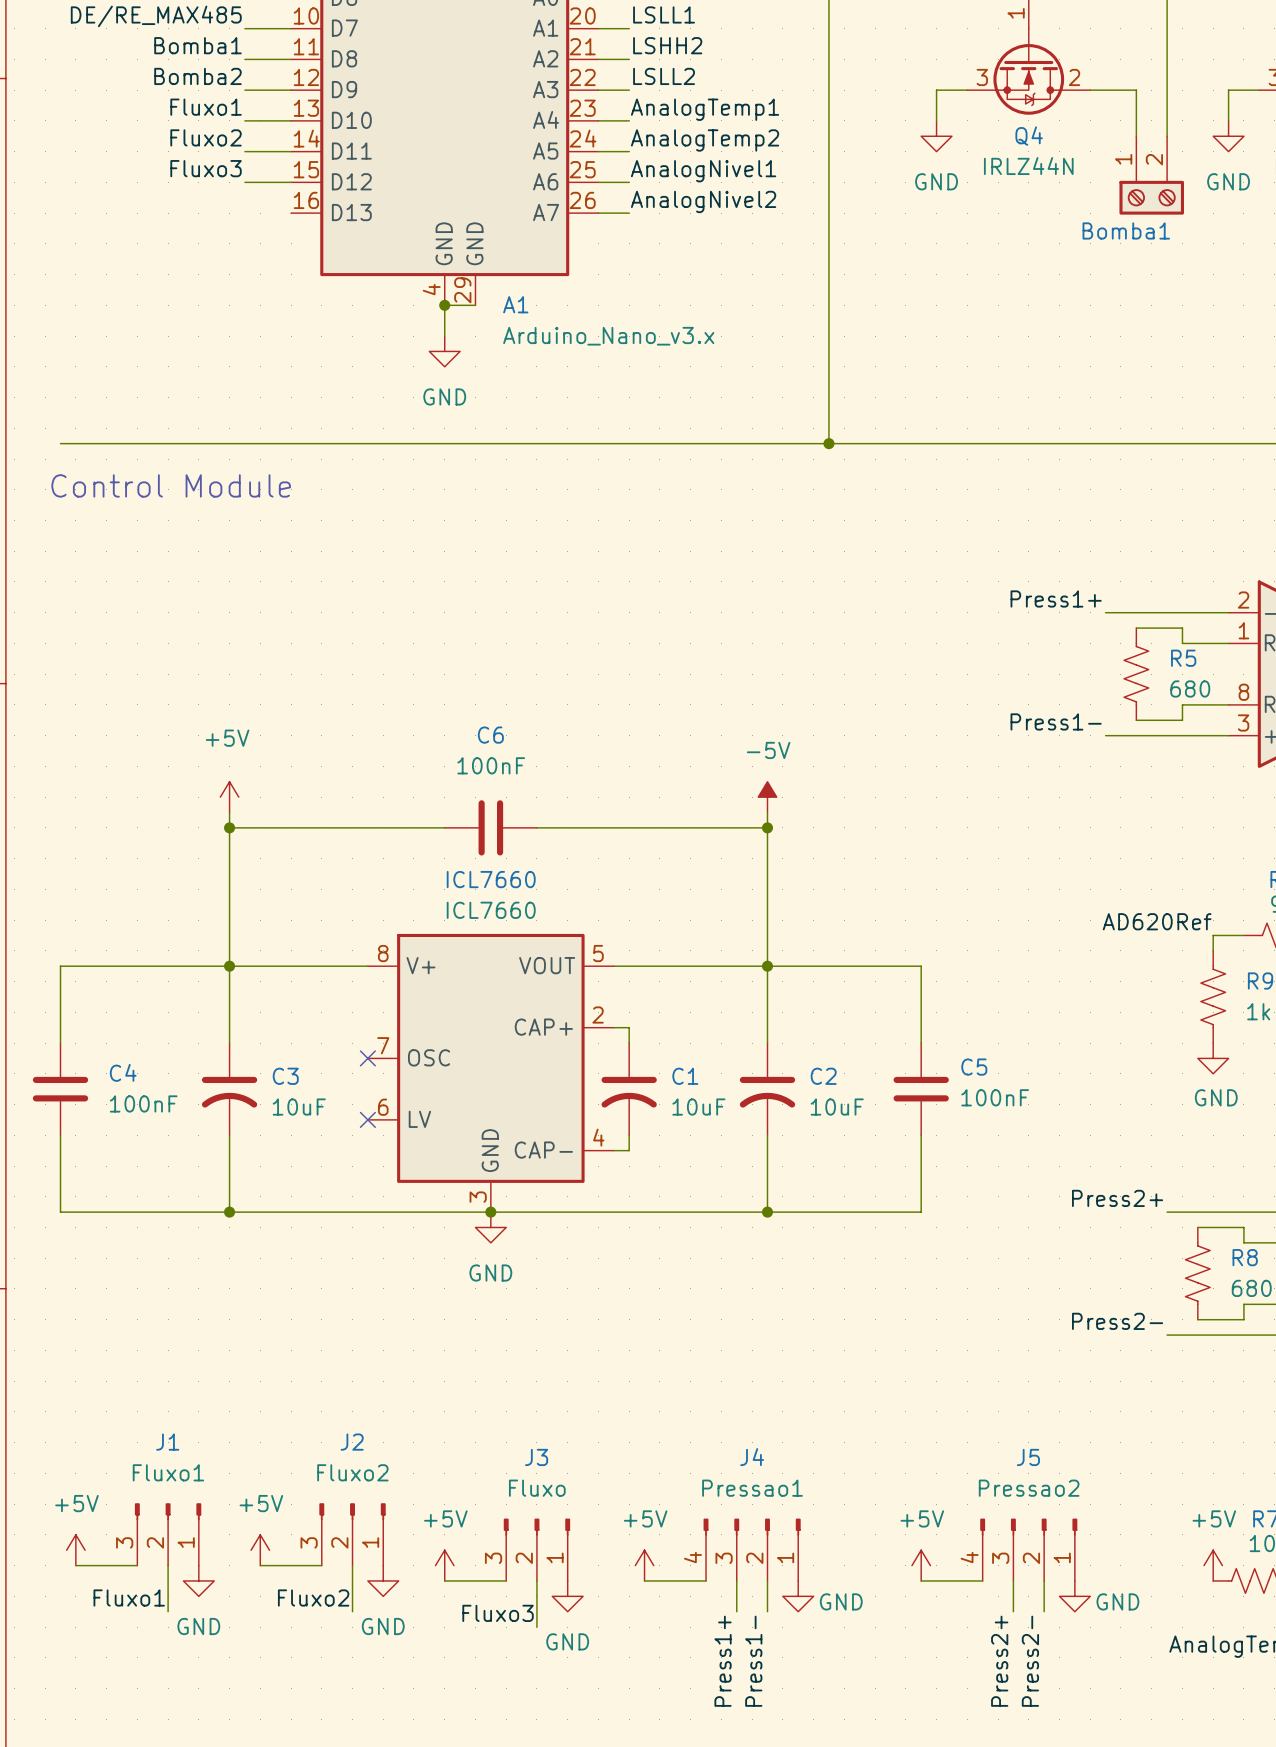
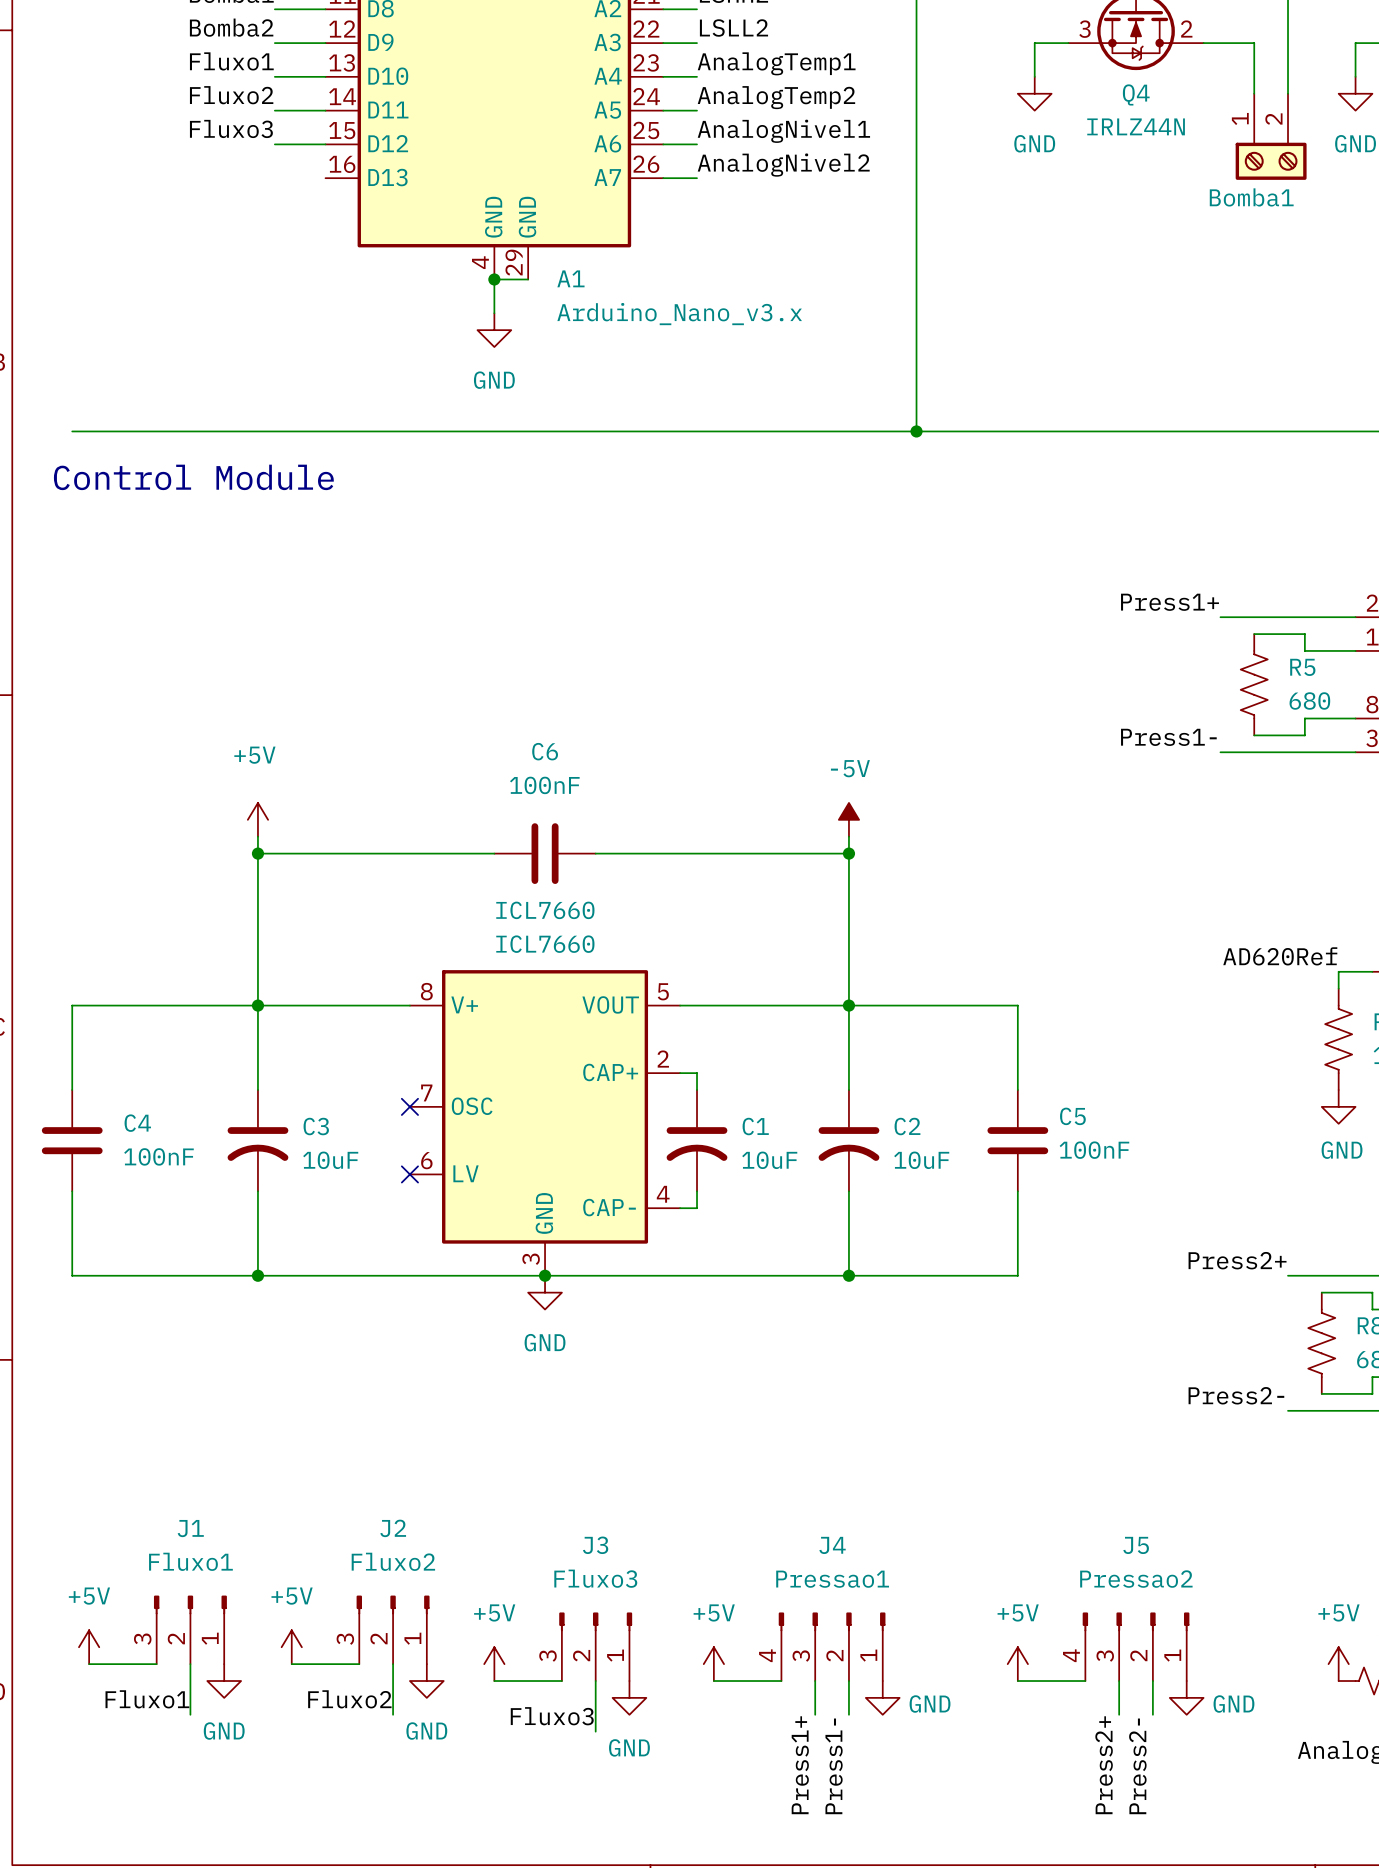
J3 value: Fluxo (537, 1488) -> Fluxo3 (595, 1578)

